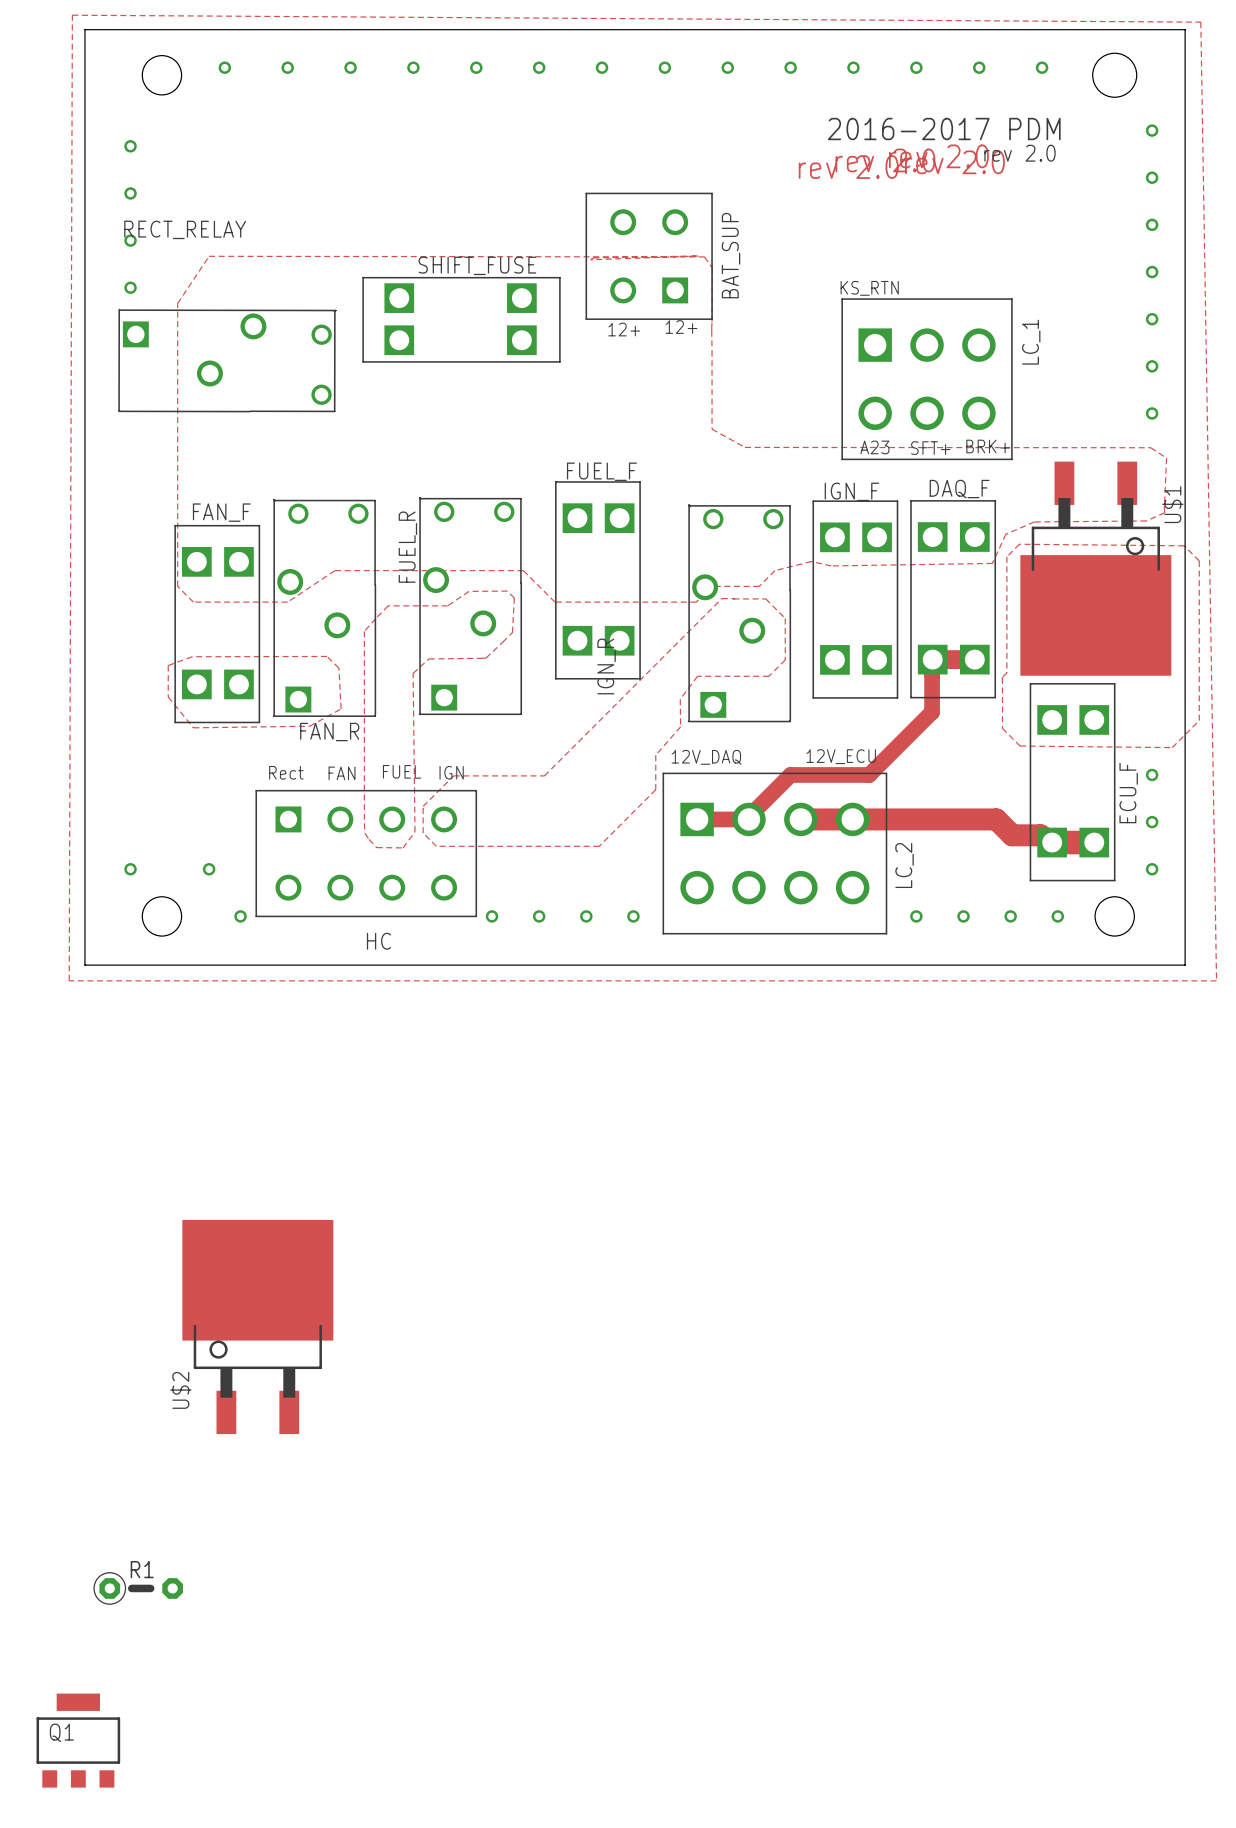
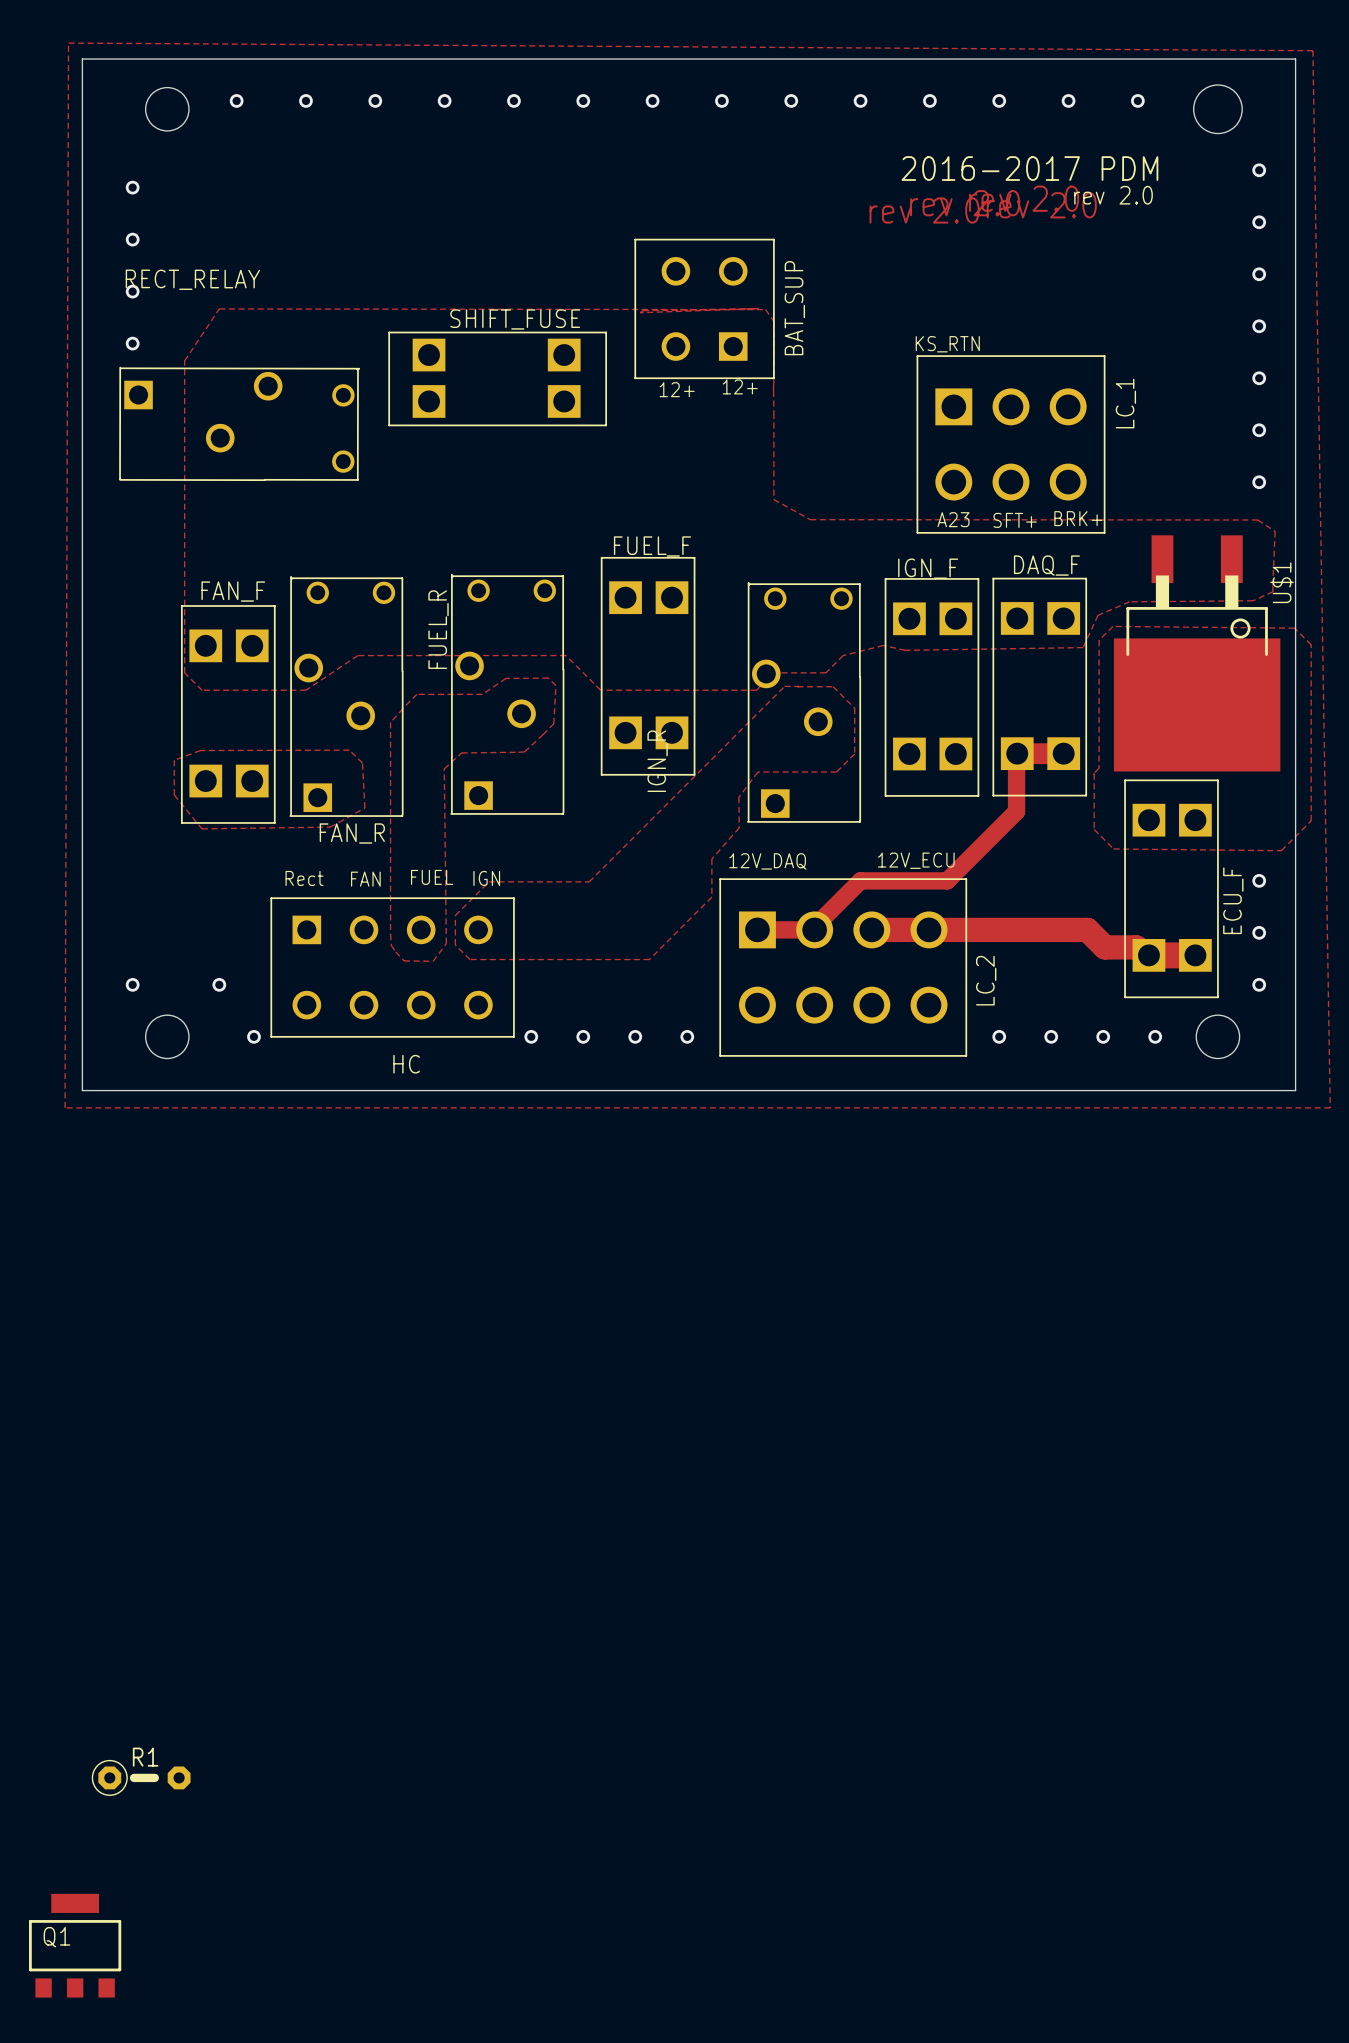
U$2: (257, 1327) -> none

